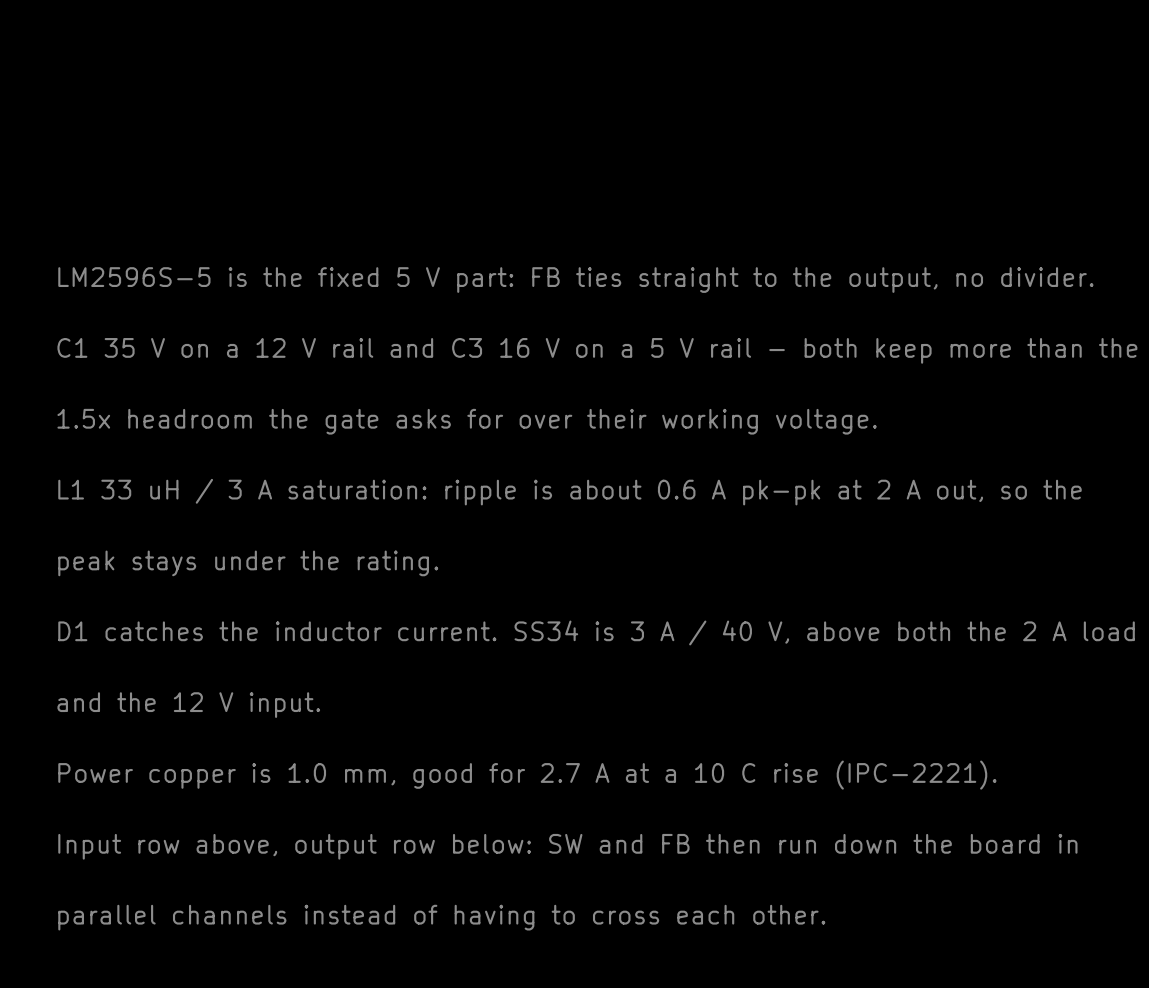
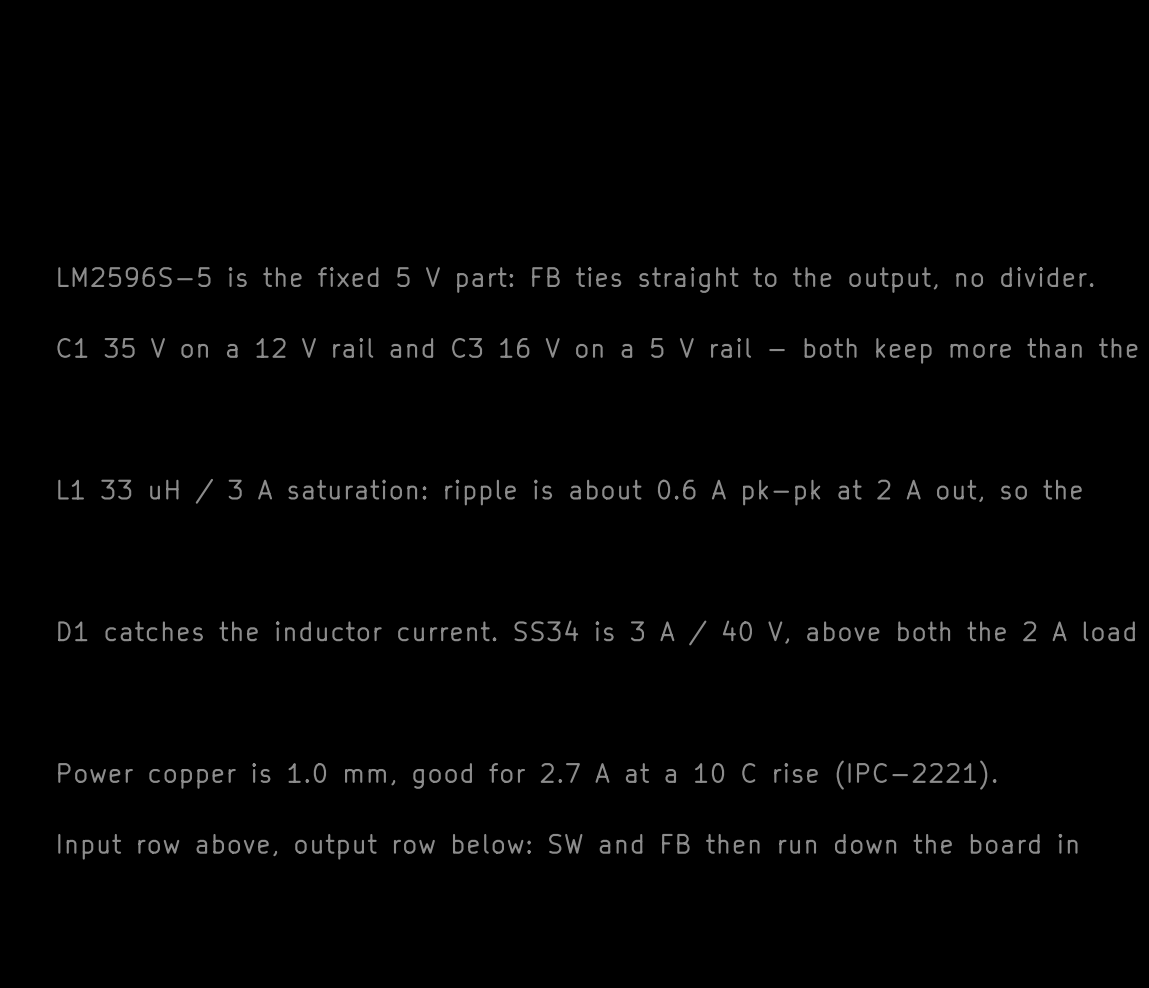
text: 1.5x headroom the gate asks for over their working voltage. (467, 421) -> none
text: peak stays under the rating. (248, 563) -> none
text: and the 12 V input. (188, 705) -> none
text: parallel channels instead of having to cross each other. (441, 917) -> none

